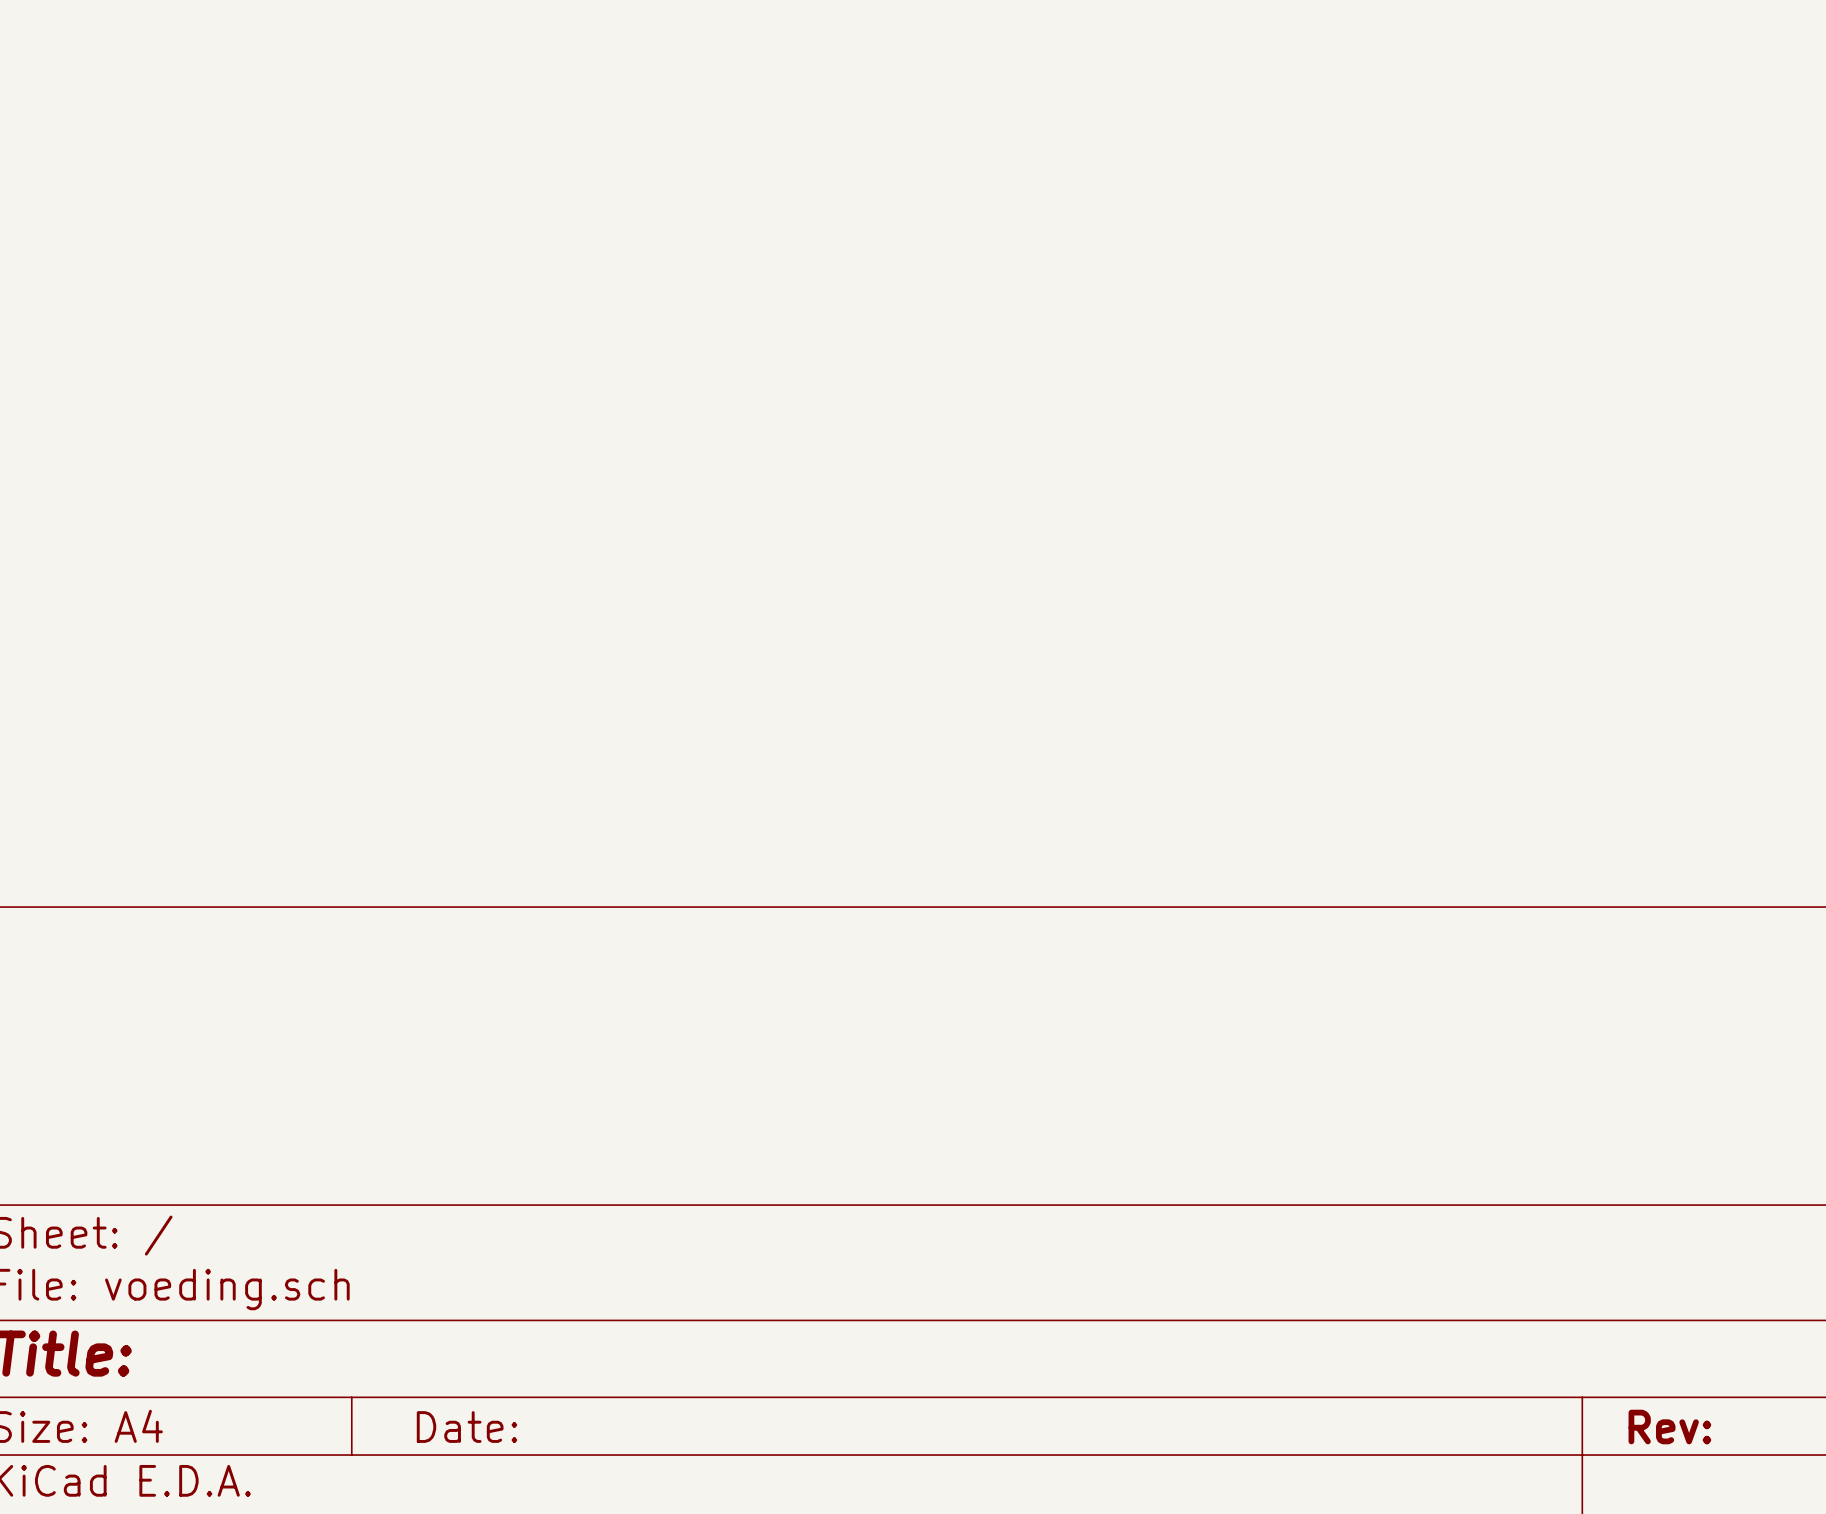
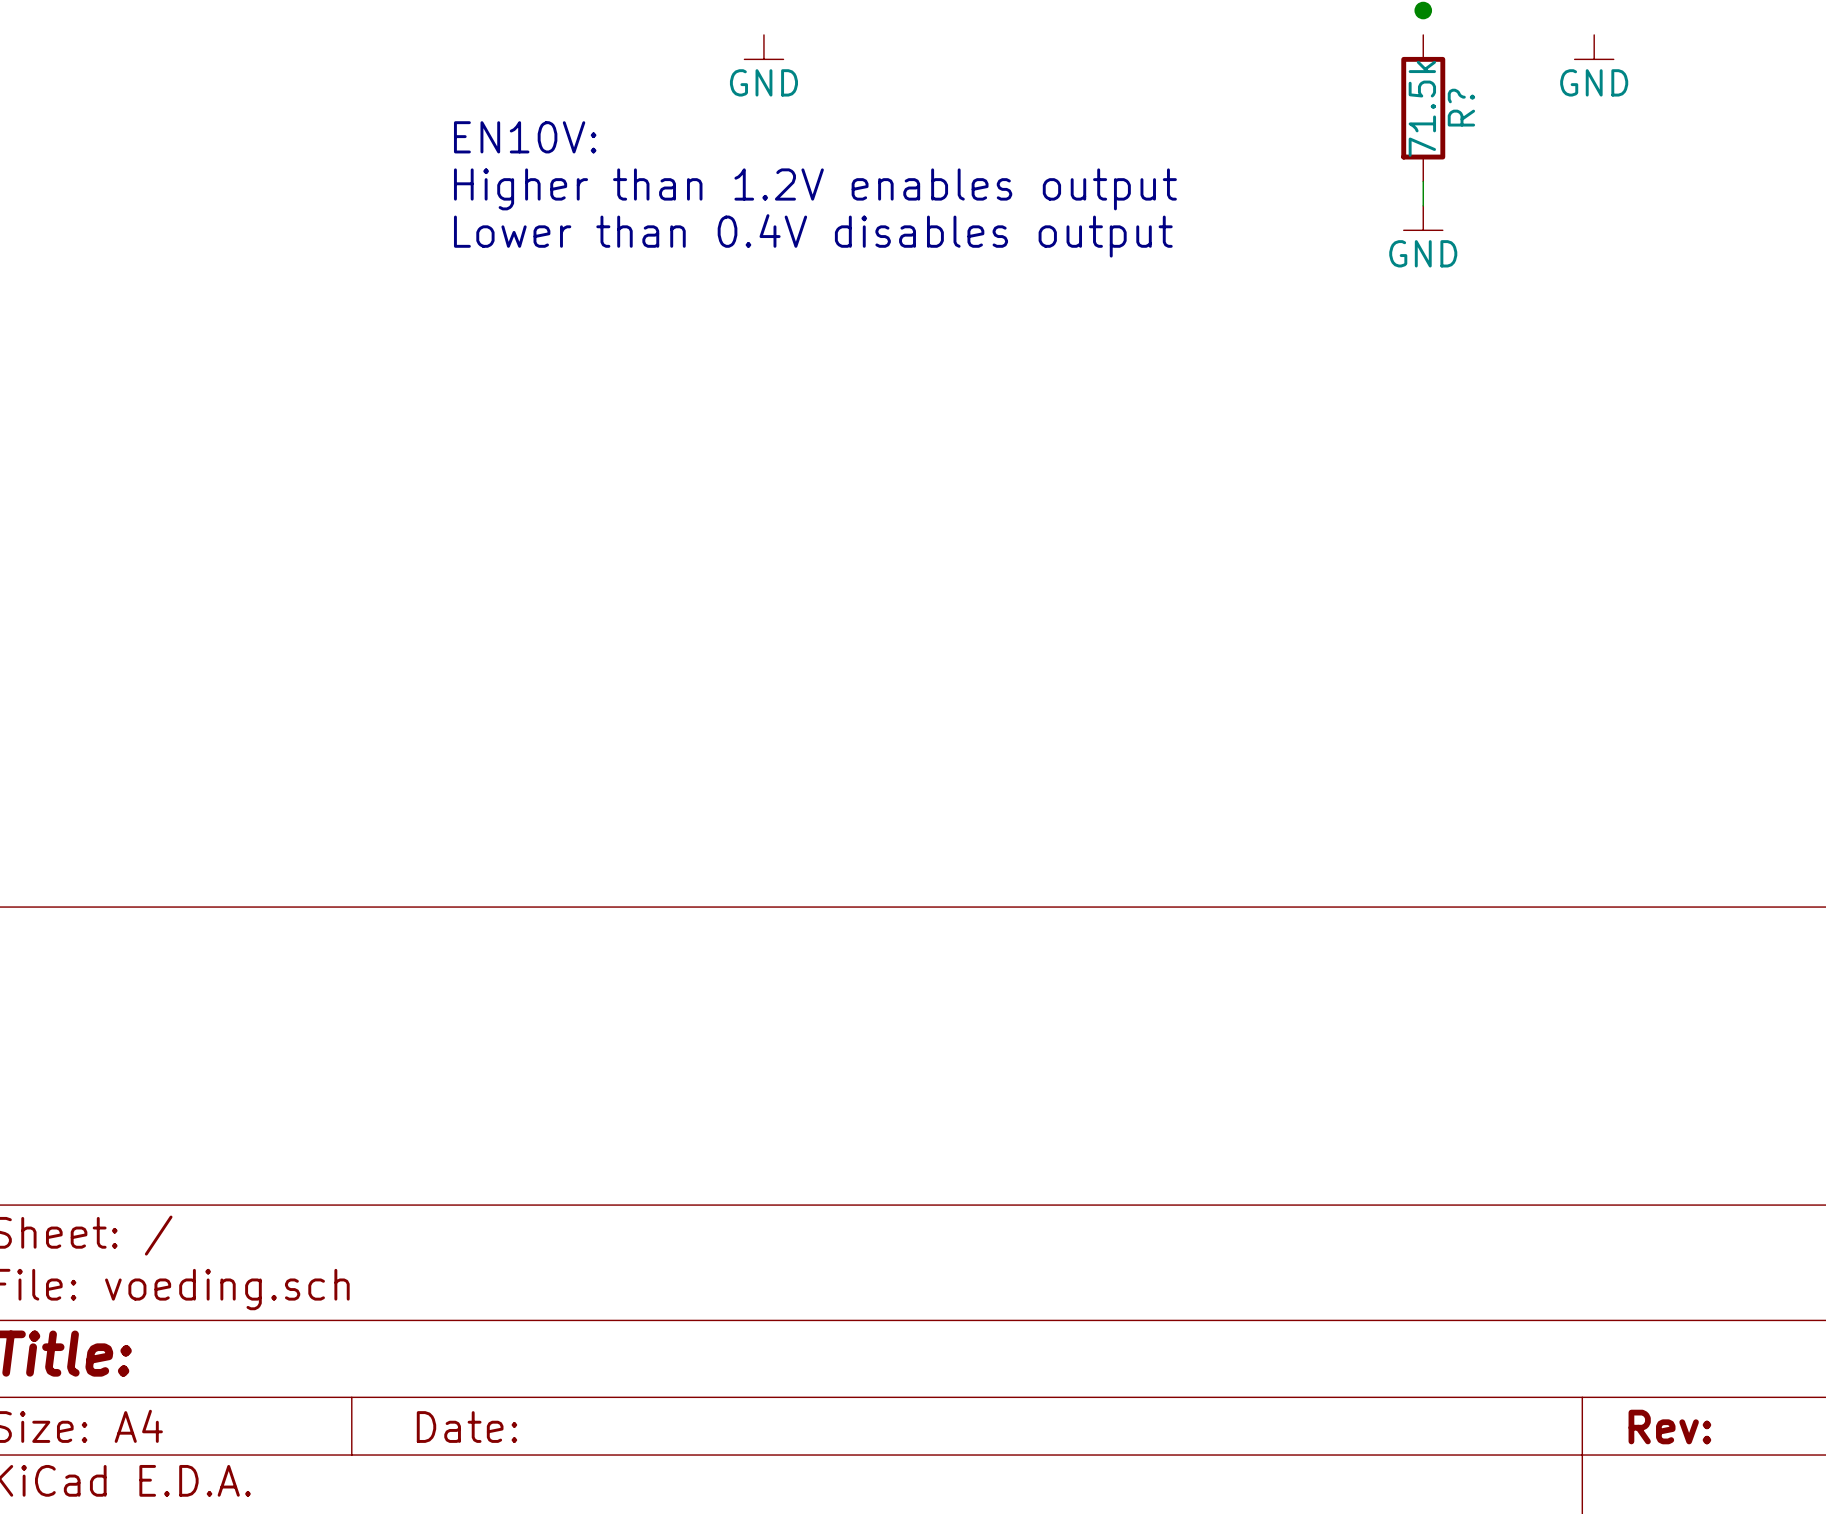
junction: none -> (1423, 10)
power symbol: none -> GND (763, 47)
power symbol: none -> GND (1594, 47)
R?: none -> 71.5k (1423, 108)
text: none -> EN10V: (525, 137)
wire: none -> (1423, 181) (1423, 205)
text: none -> Higher than 1.2V enables output (815, 189)
power symbol: none -> GND (1423, 218)
text: none -> Lower than 0.4V disables output (813, 235)

